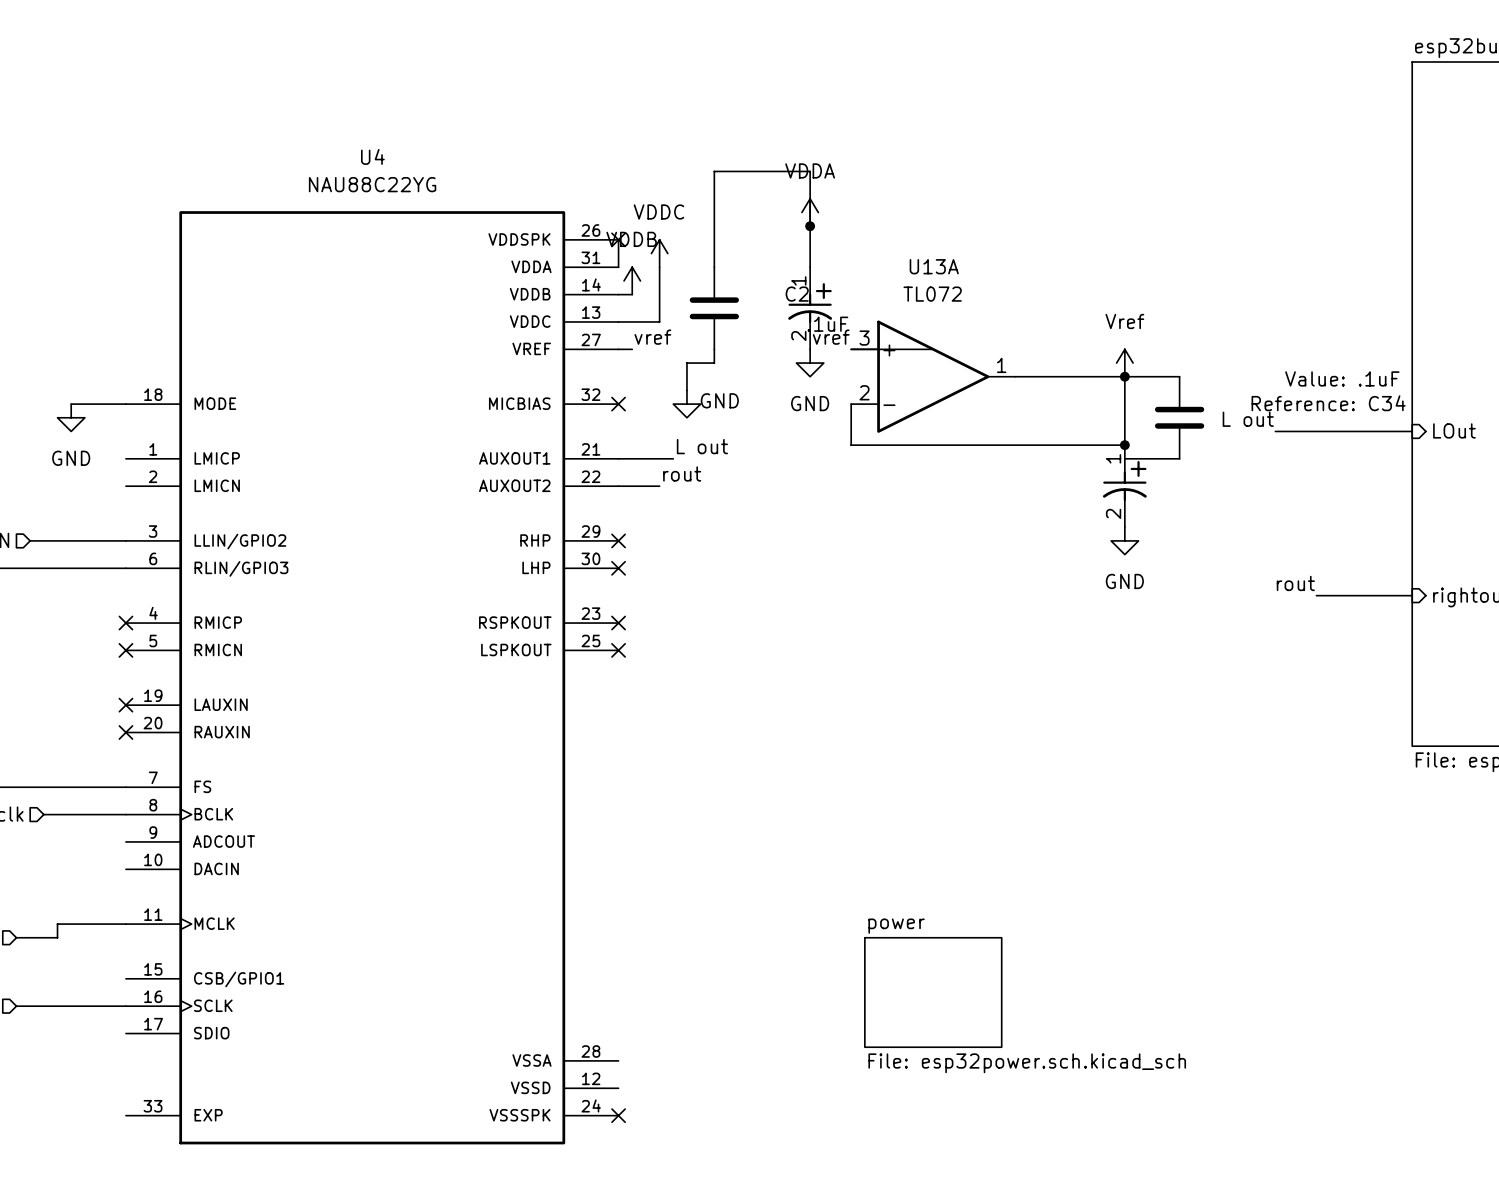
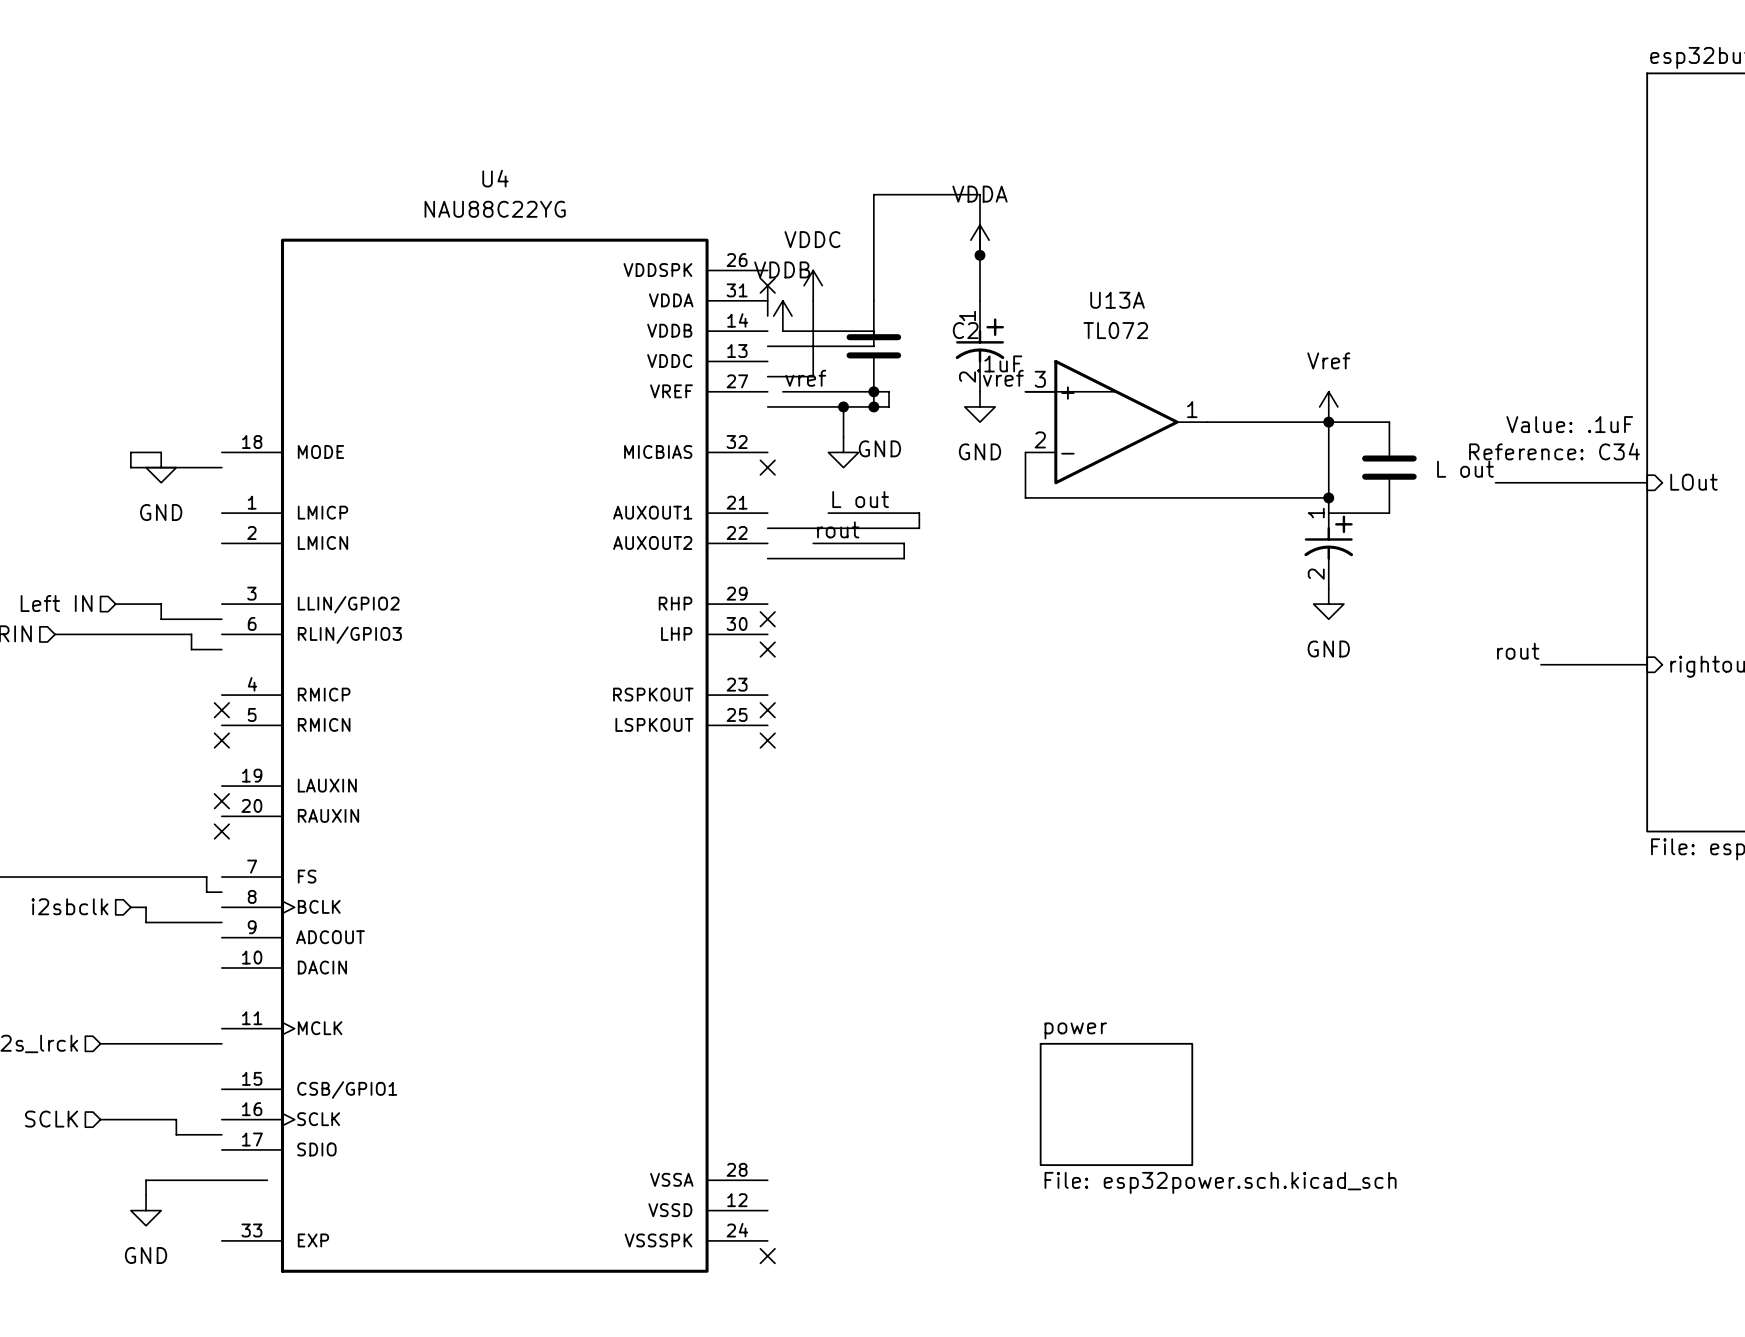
wire: (618, 239) (618, 253) -> (767, 300) (767, 315)
no-connect mark position: (618, 239) -> (767, 285)
wire: (618, 294) (632, 294) -> (767, 346) (873, 346) (873, 331) (782, 331)
wire: (618, 321) (659, 321) -> (767, 376) (813, 376) (813, 361)
wire: (618, 349) (632, 349) -> (873, 406) (889, 406) (889, 391) (782, 391)
junction: none -> (873, 391)
wire: none -> (767, 406) (843, 406)
junction: none -> (843, 406)
junction: none -> (873, 406)
wire: (71, 404) (125, 404) -> (161, 452) (130, 452) (130, 467) (221, 467)
no-connect mark position: (618, 404) -> (767, 467)
wire: (618, 458) (673, 458) -> (767, 528) (919, 528) (919, 513) (828, 513)
wire: (618, 486) (659, 486) -> (767, 558) (904, 558) (904, 543) (813, 543)
wire: (71, 540) (125, 540) -> (161, 604) (161, 619) (221, 619)
no-connect mark: (618, 540) -> none
no-connect mark: none -> (767, 619)
wire: (98, 568) (125, 568) -> (191, 634) (191, 649) (221, 649)
no-connect mark: (618, 568) -> none
no-connect mark: none -> (767, 649)
no-connect mark: (125, 623) -> none
no-connect mark: (618, 623) -> none
no-connect mark: none -> (221, 710)
no-connect mark: none -> (767, 710)
no-connect mark: (125, 650) -> none
no-connect mark: (618, 650) -> none
no-connect mark: none -> (221, 740)
no-connect mark: none -> (767, 740)
no-connect mark: (125, 705) -> none
no-connect mark: none -> (221, 801)
no-connect mark: (125, 732) -> none
no-connect mark: none -> (221, 831)
wire: (112, 787) (125, 787) -> (206, 877) (206, 892) (221, 892)
wire: (57, 814) (125, 814) -> (146, 907) (146, 922) (221, 922)
wire: (125, 924) (57, 924) (57, 937) -> (221, 1043) (146, 1043)
wire: (84, 1006) (125, 1006) -> (176, 1119) (176, 1134) (221, 1134)
wire: none -> (267, 1180) (146, 1180) (146, 1195)
power symbol: none -> GND (146, 1210)
no-connect mark position: (618, 1115) -> (767, 1256)

